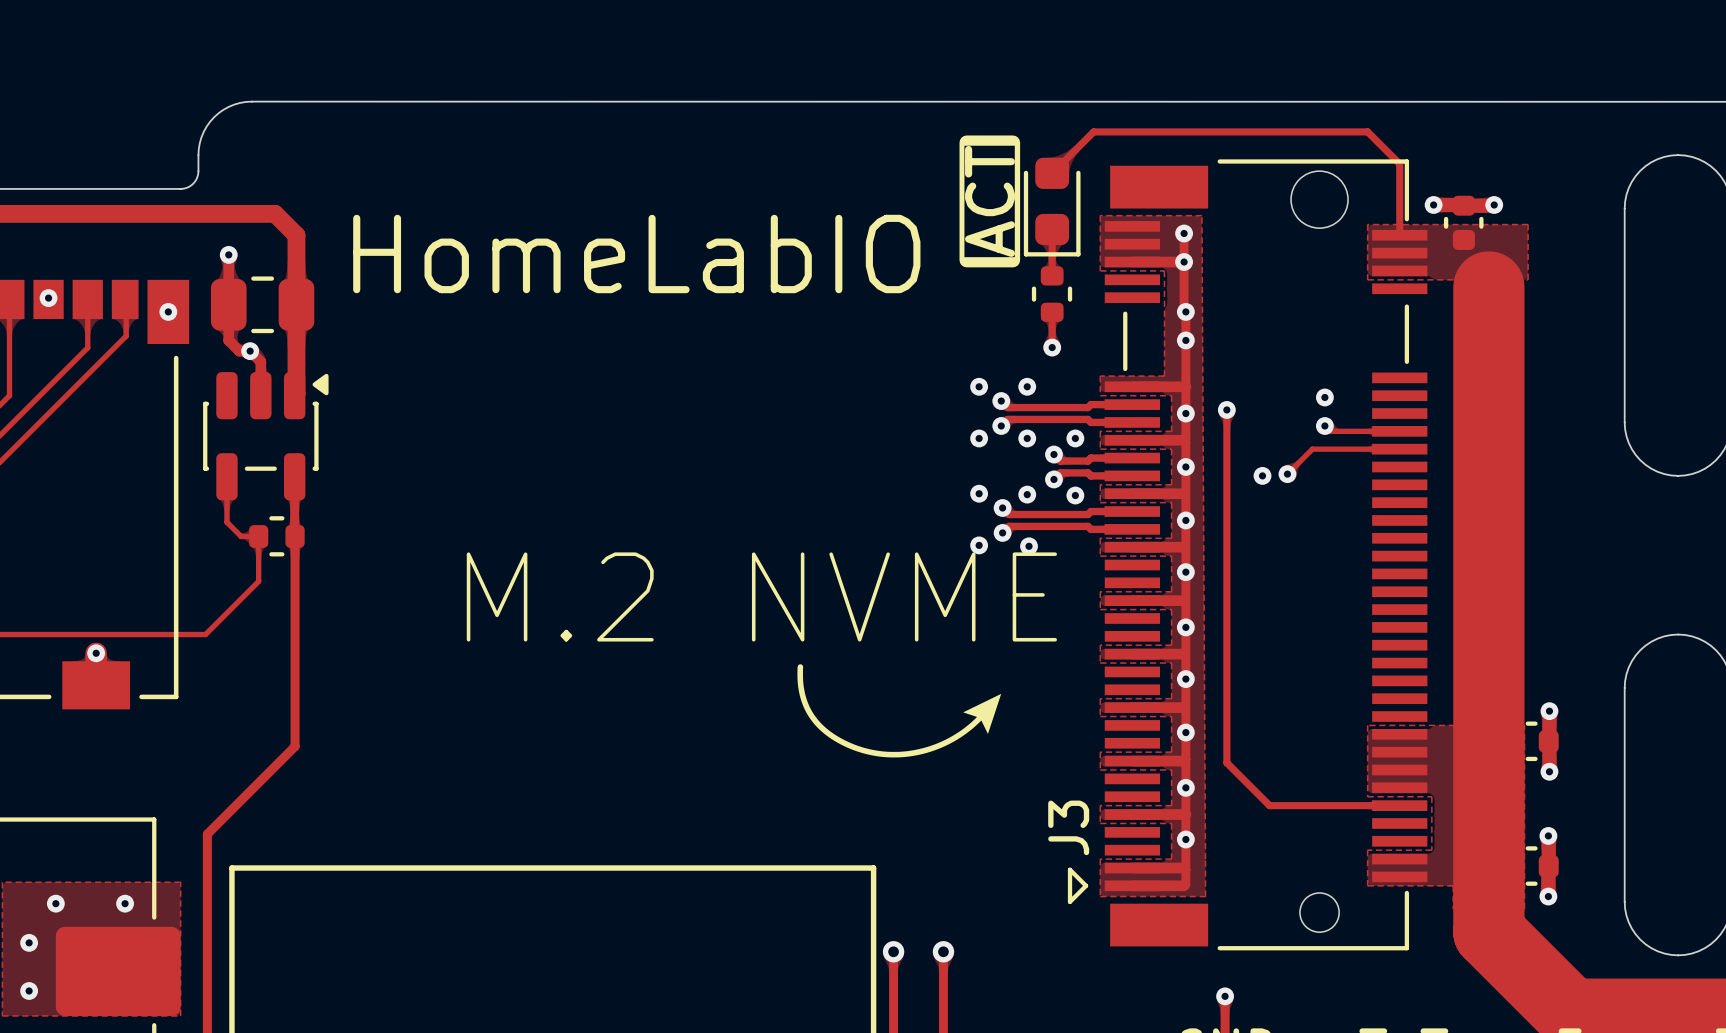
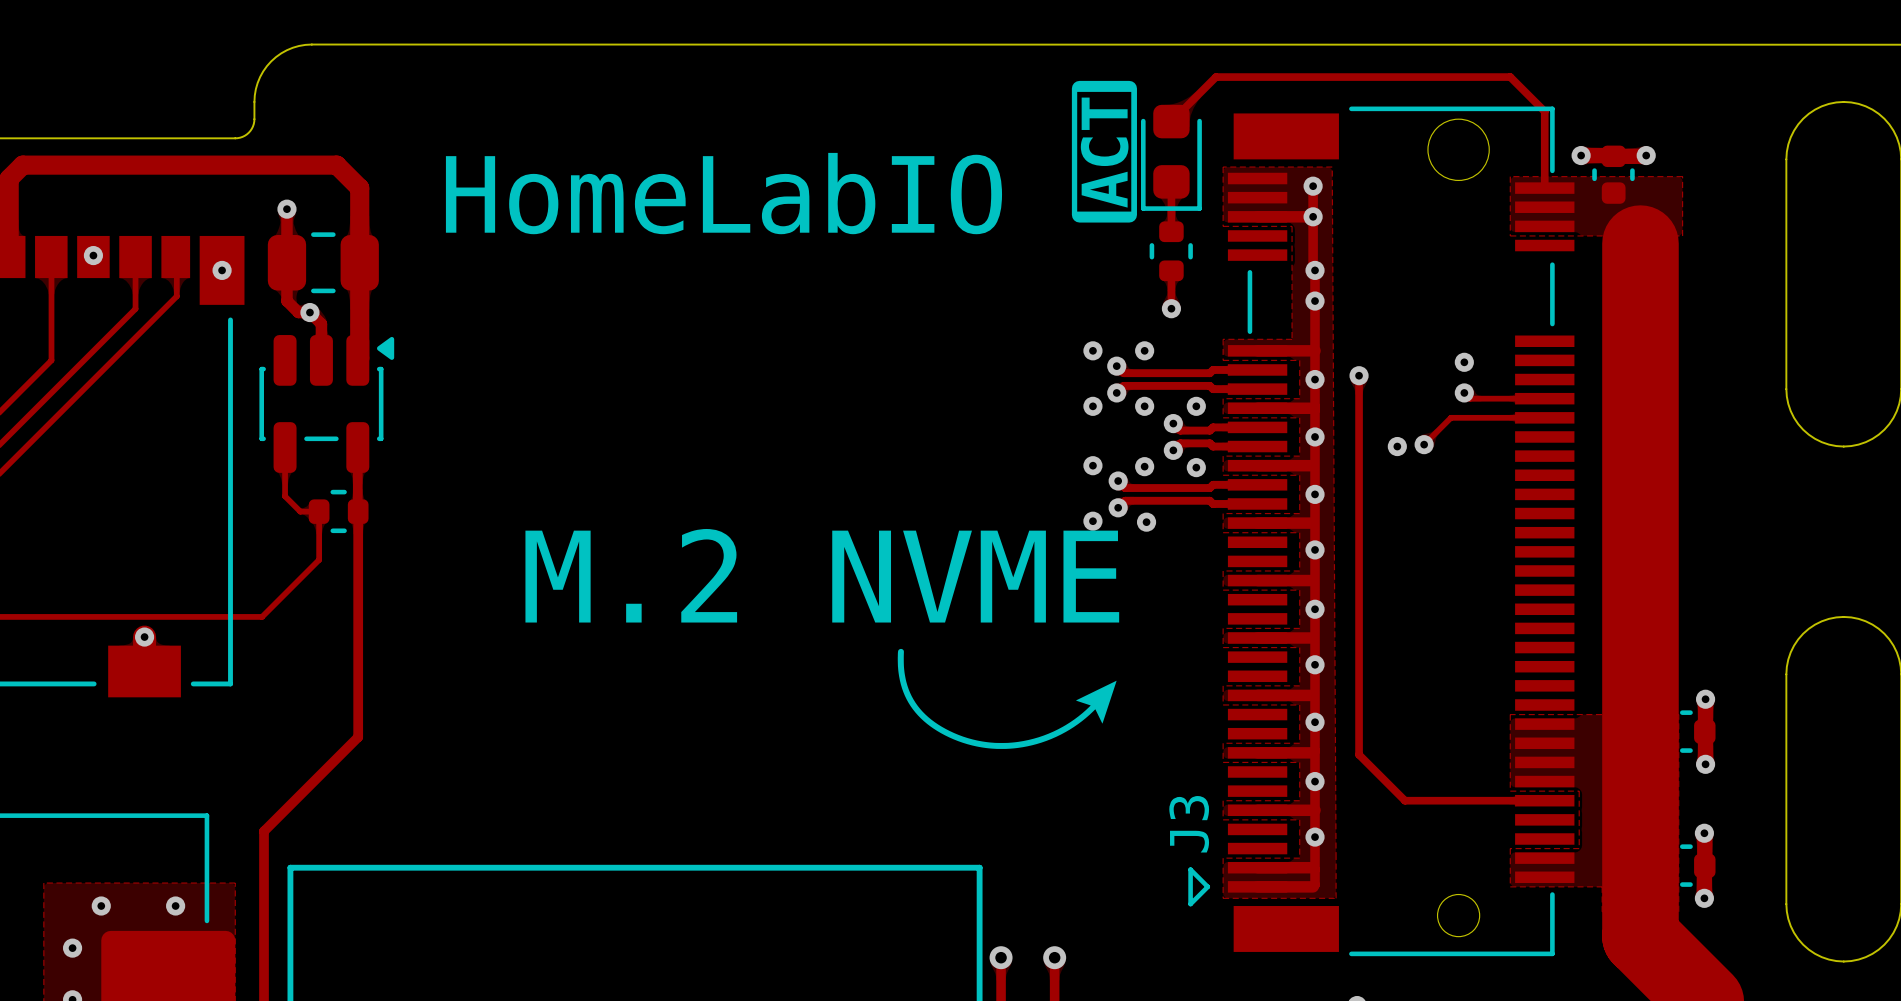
text position: HomeLabIO (636, 254) -> HomeLabIO (723, 193)

